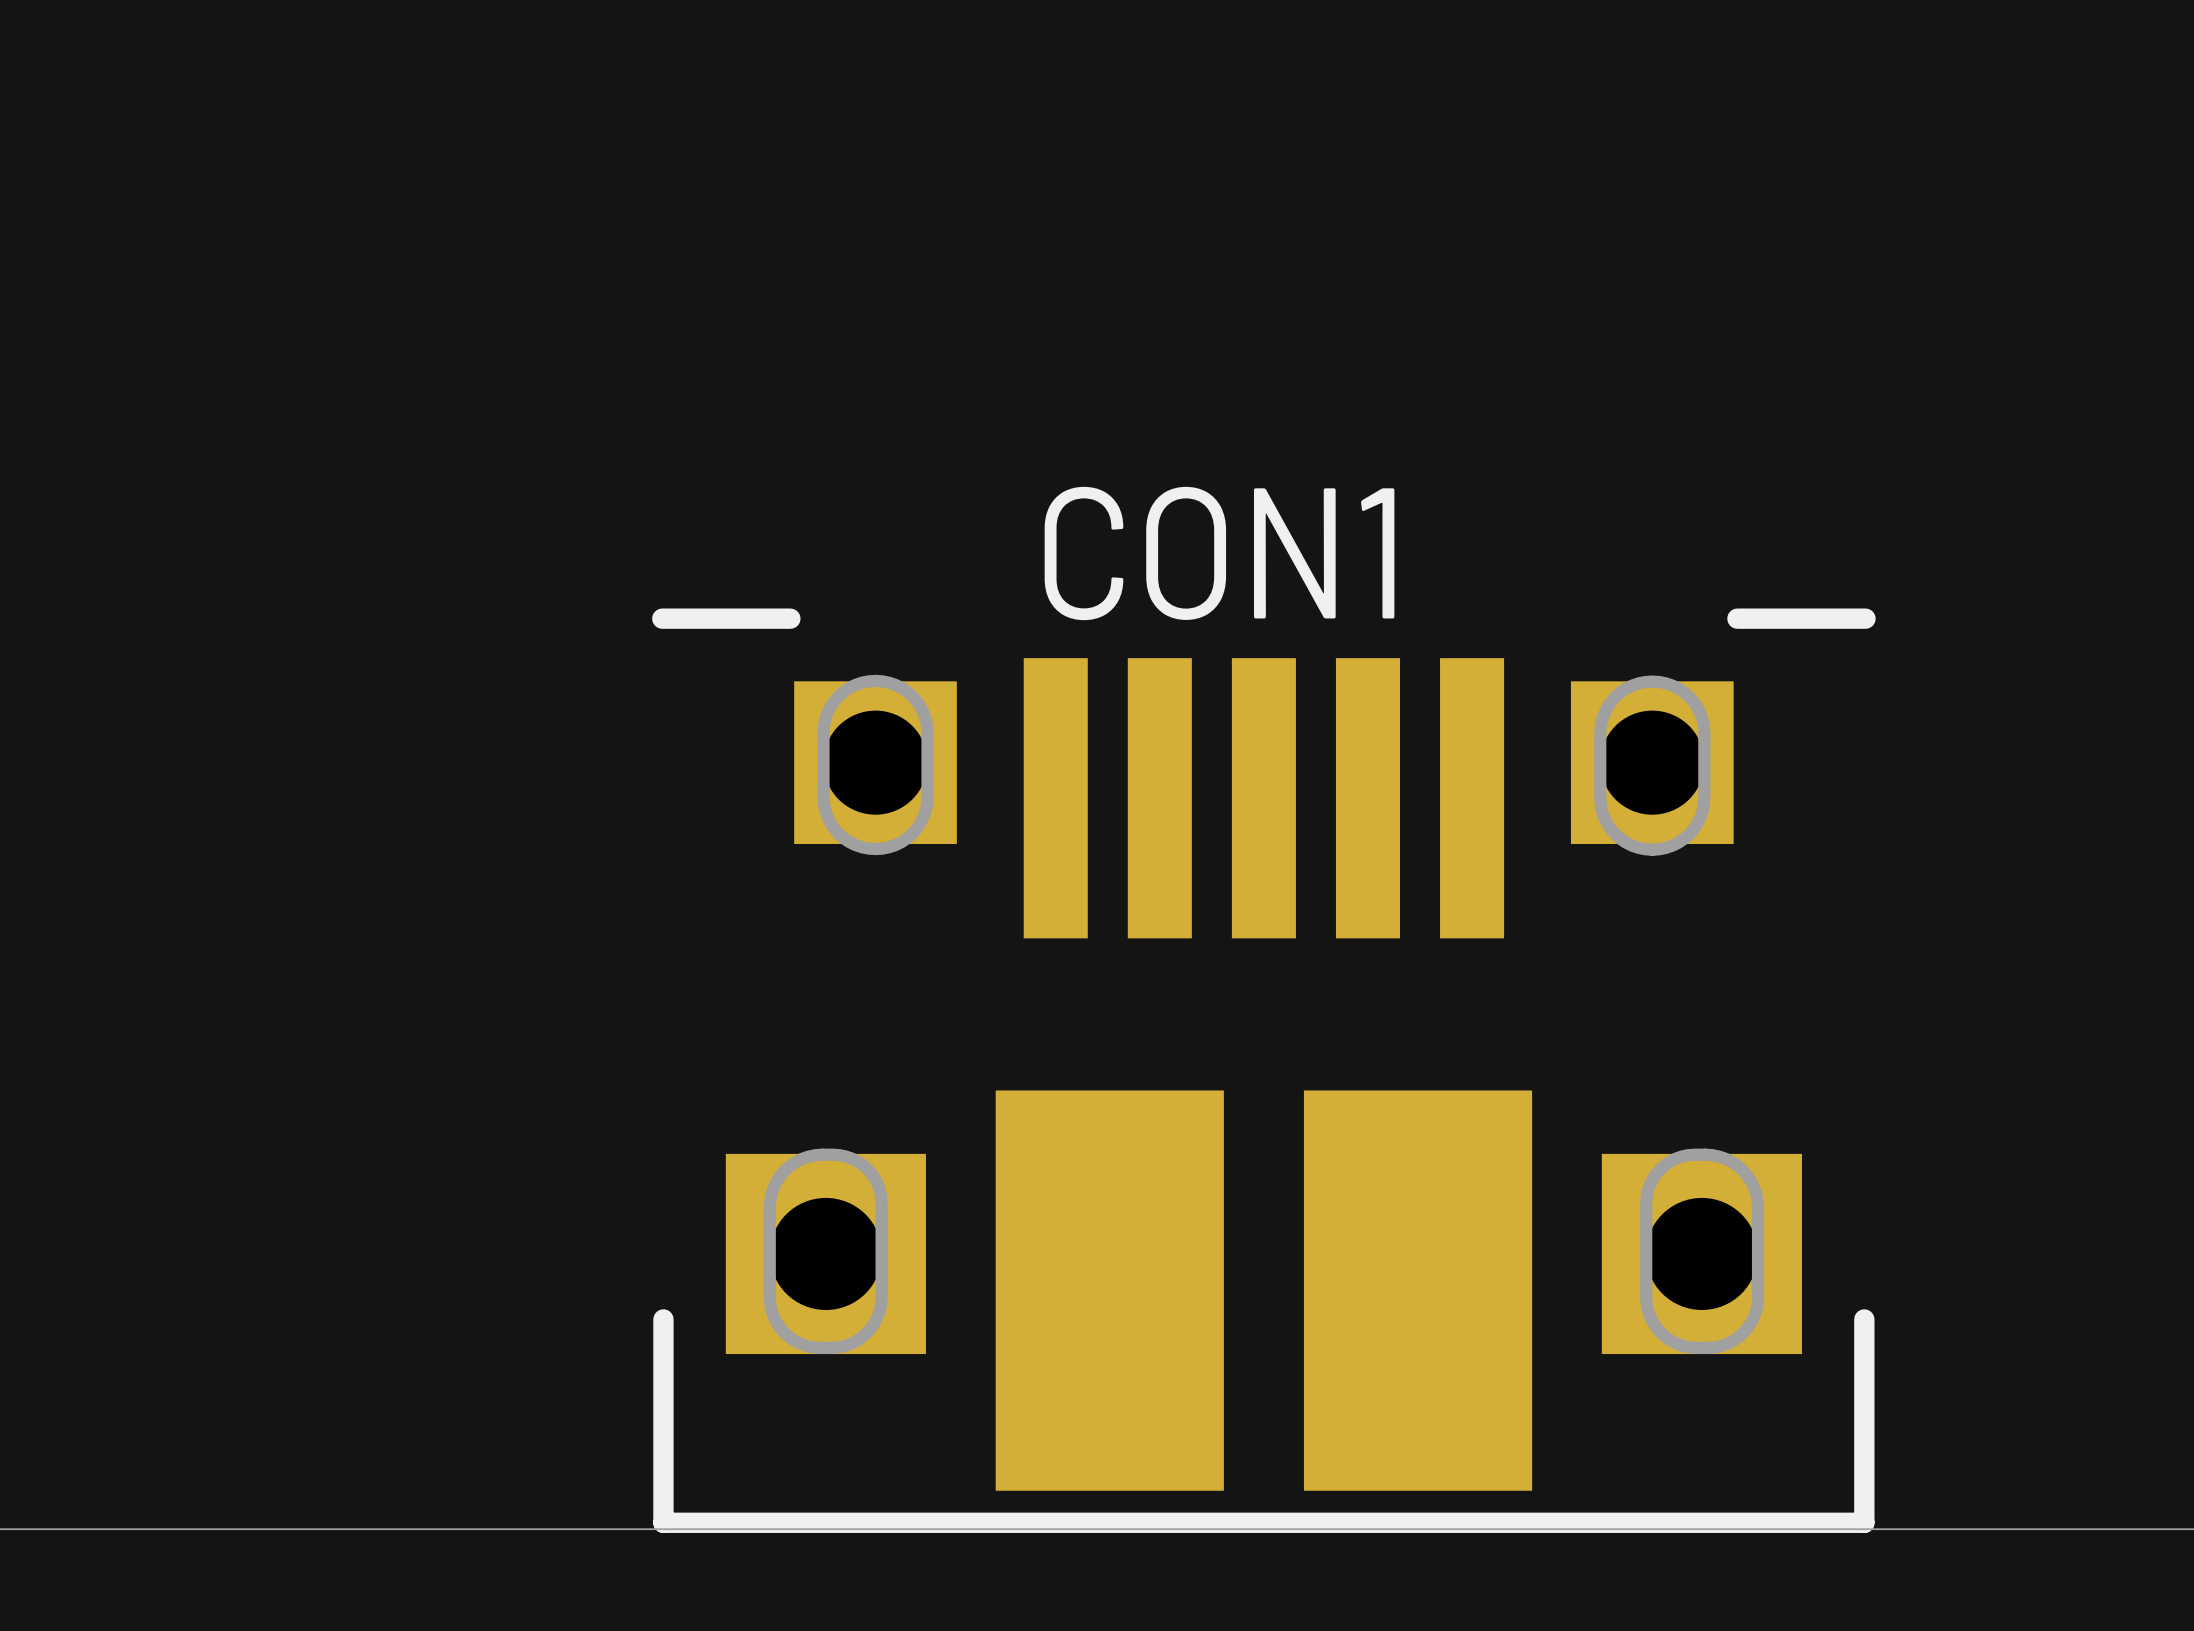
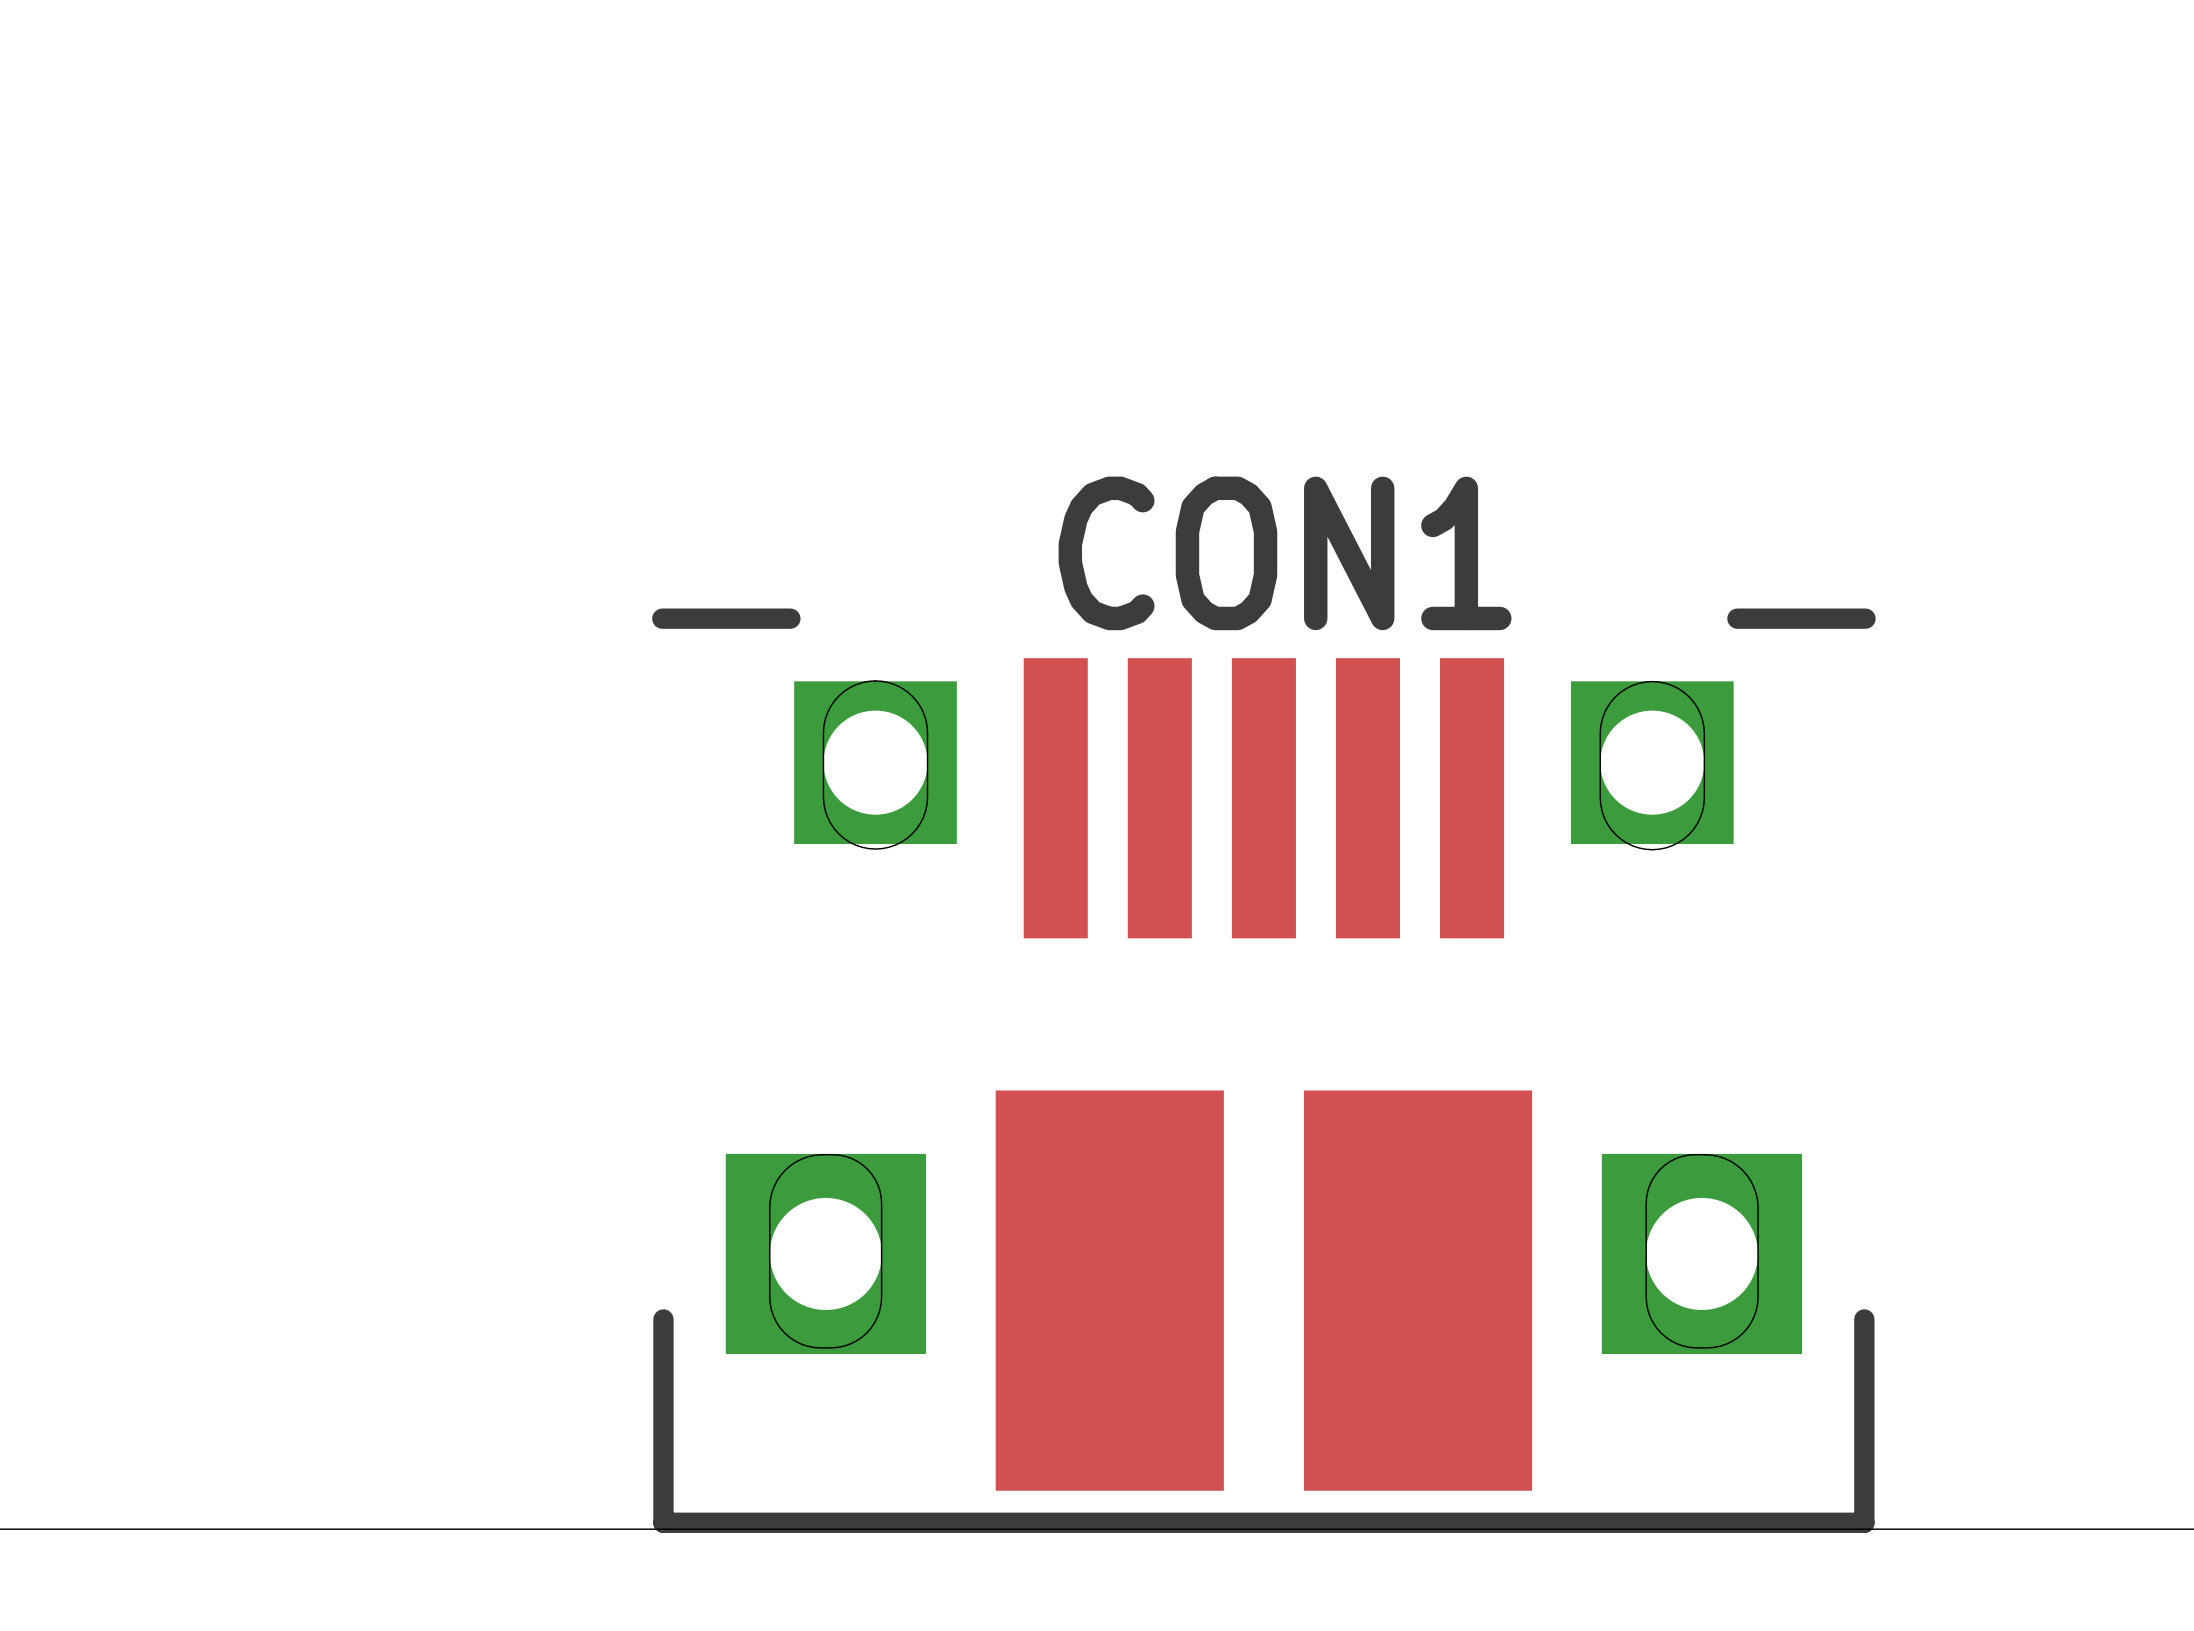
CON1 footprint: [652, 608, 1876, 1533] -> [652, 608, 1876, 1533]

